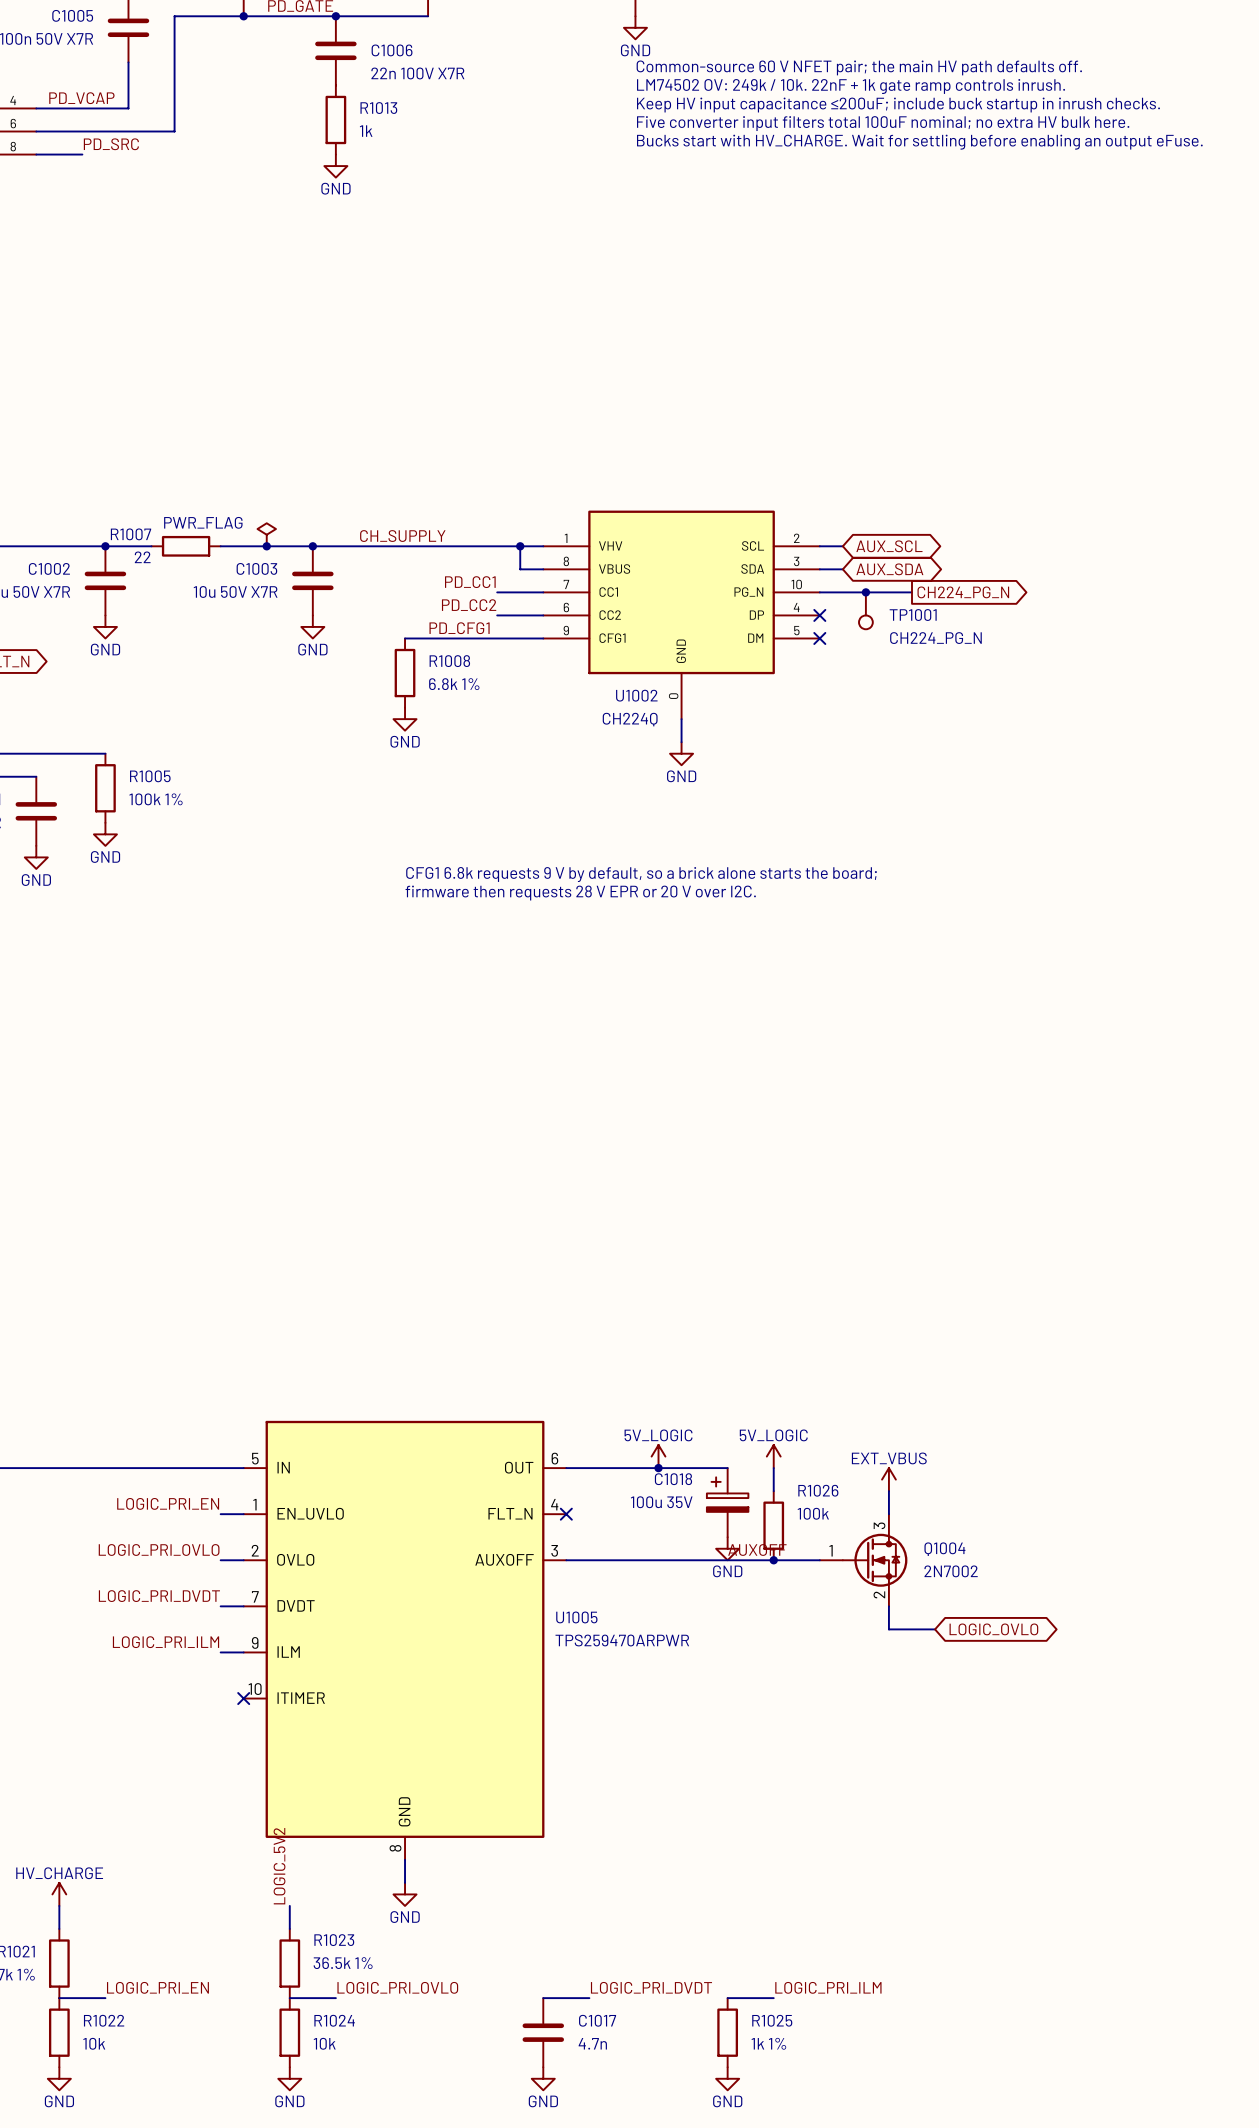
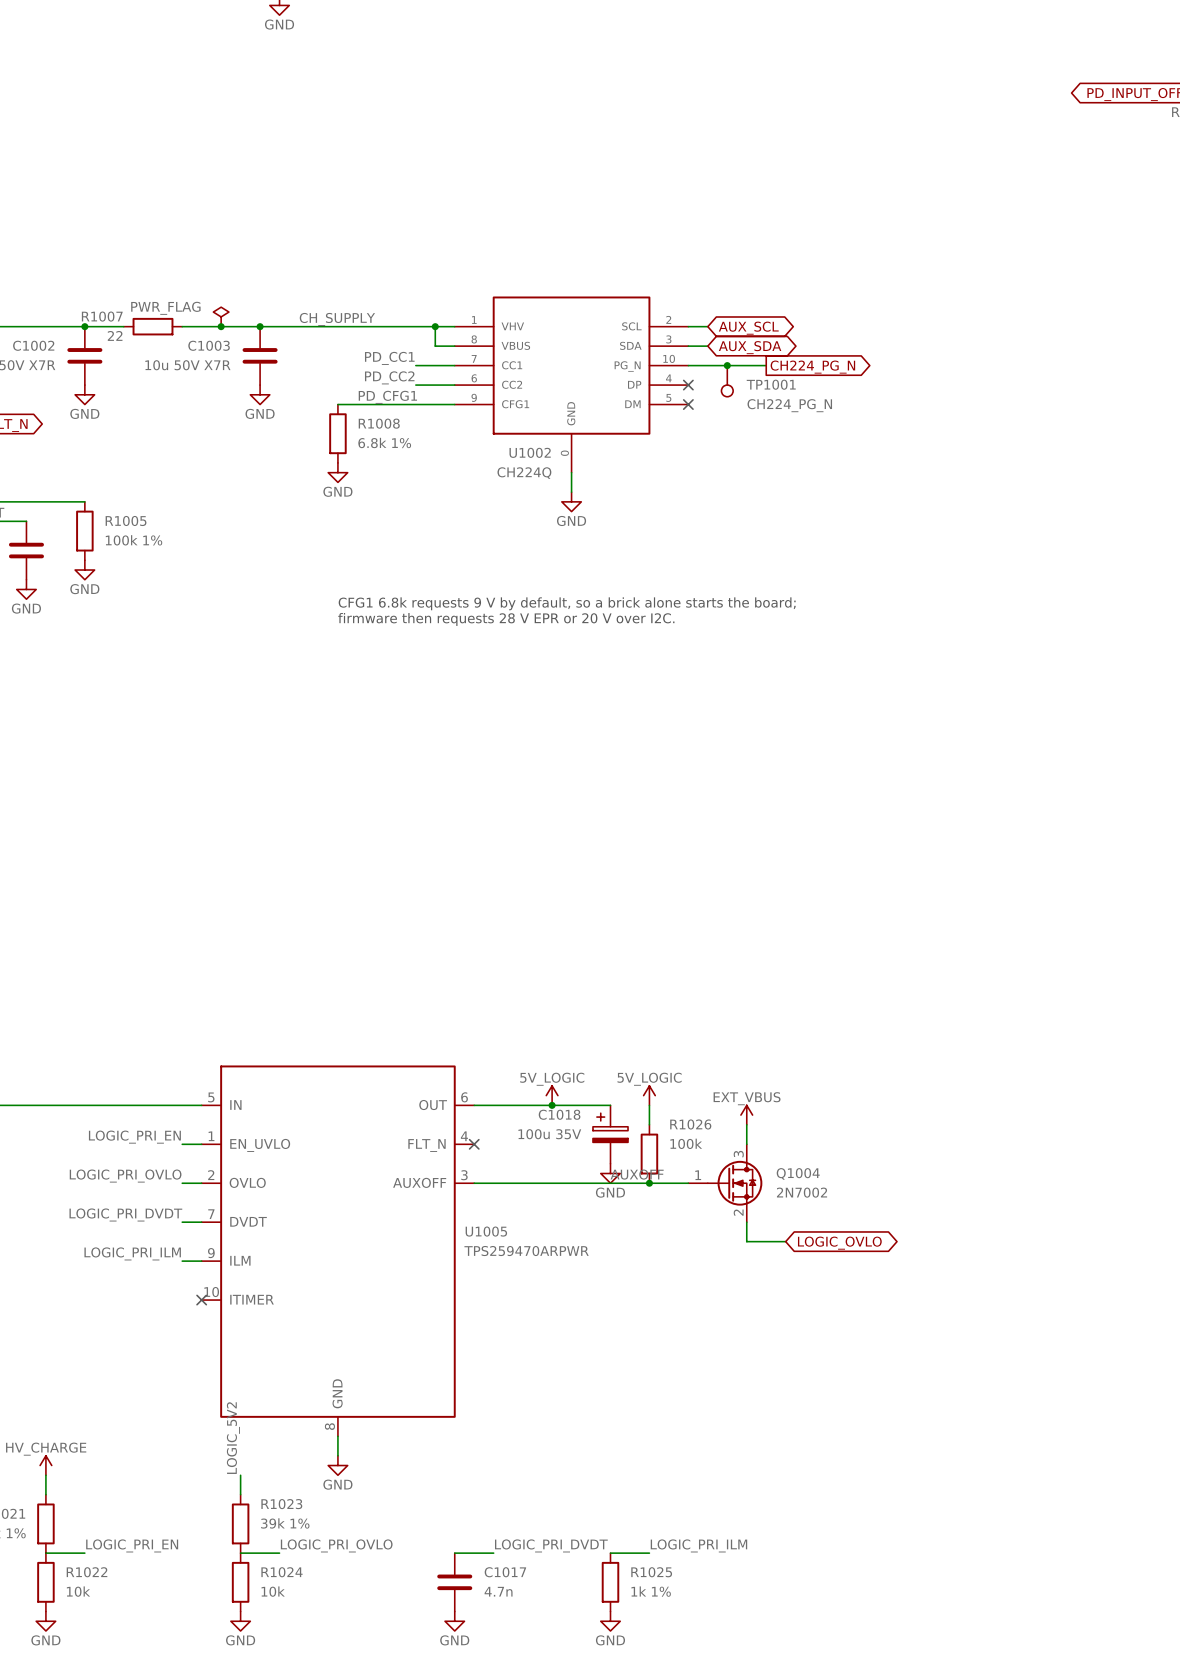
R1023 value: 36.5k 1% (343, 1963) -> 39k 1% (285, 1523)

